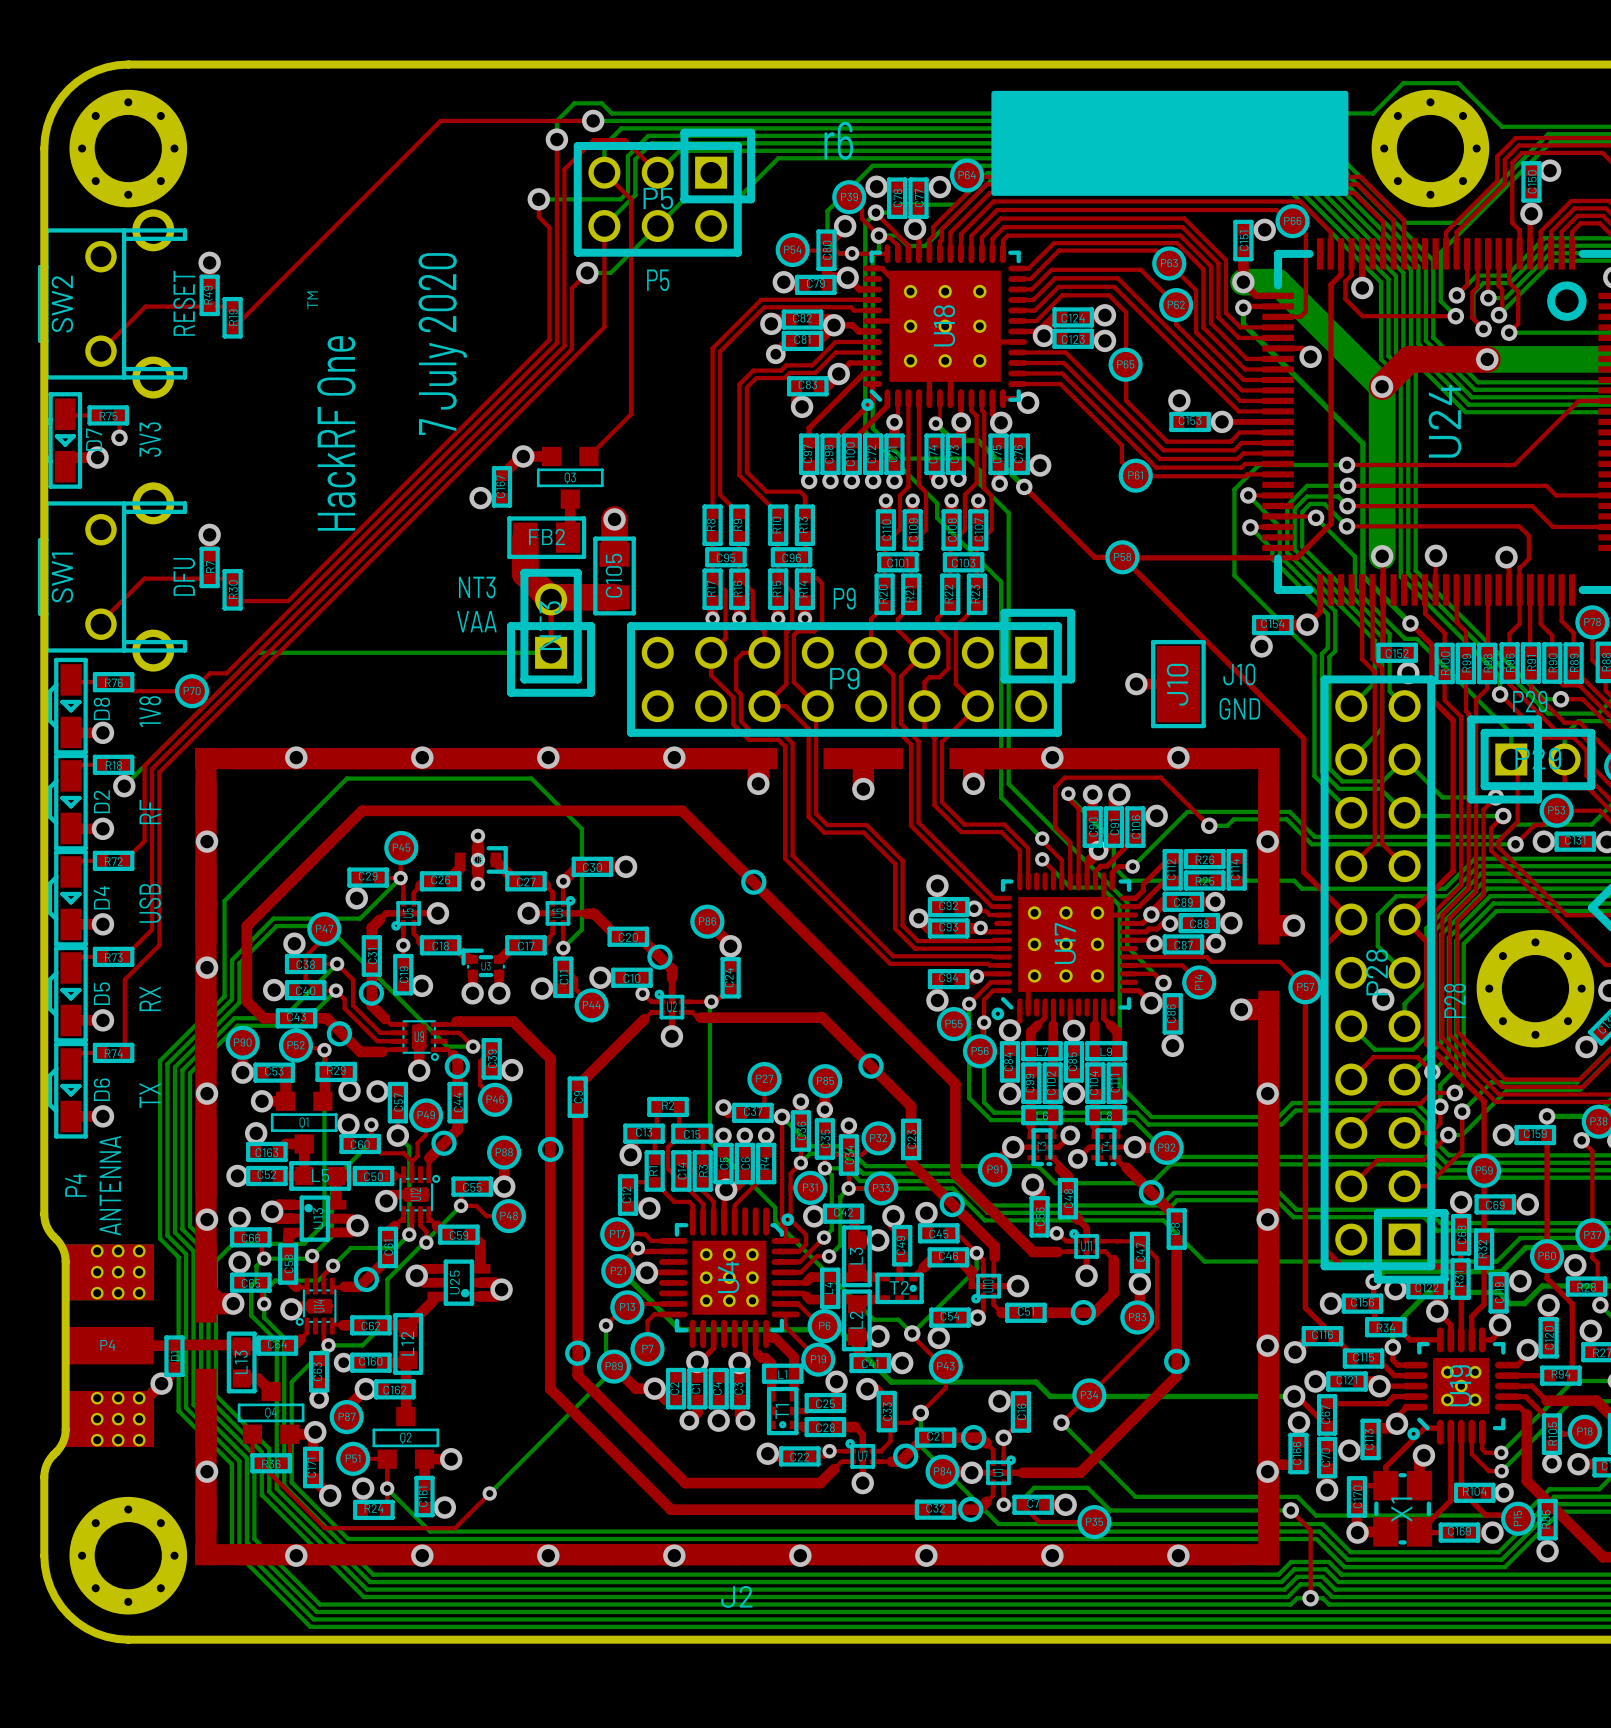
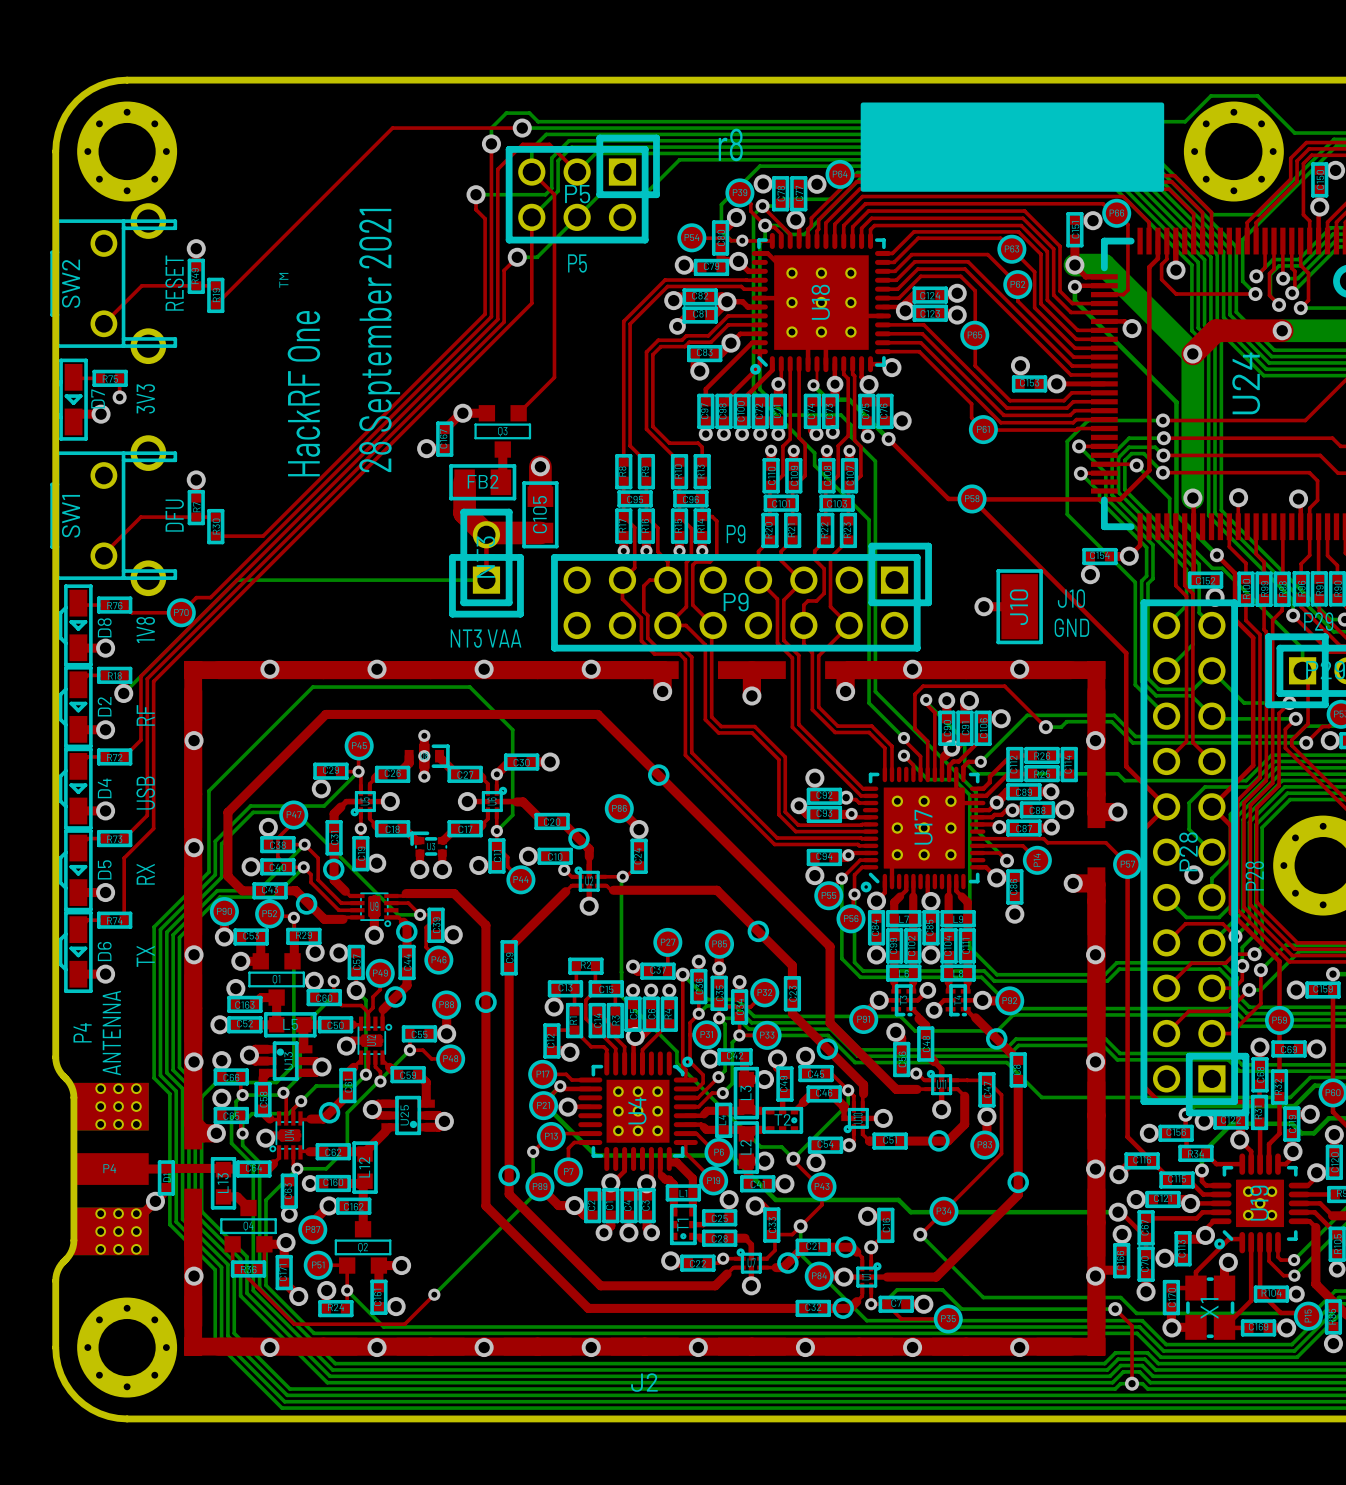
text: r6 (838, 140) -> r8 (730, 144)
text: 7 July 2020 (442, 344) -> none
text: none -> 28 September 2021 (379, 340)
text: NT3 (477, 587) -> none
text: VAA (476, 621) -> none
text: none -> NT3 VAA (486, 638)

